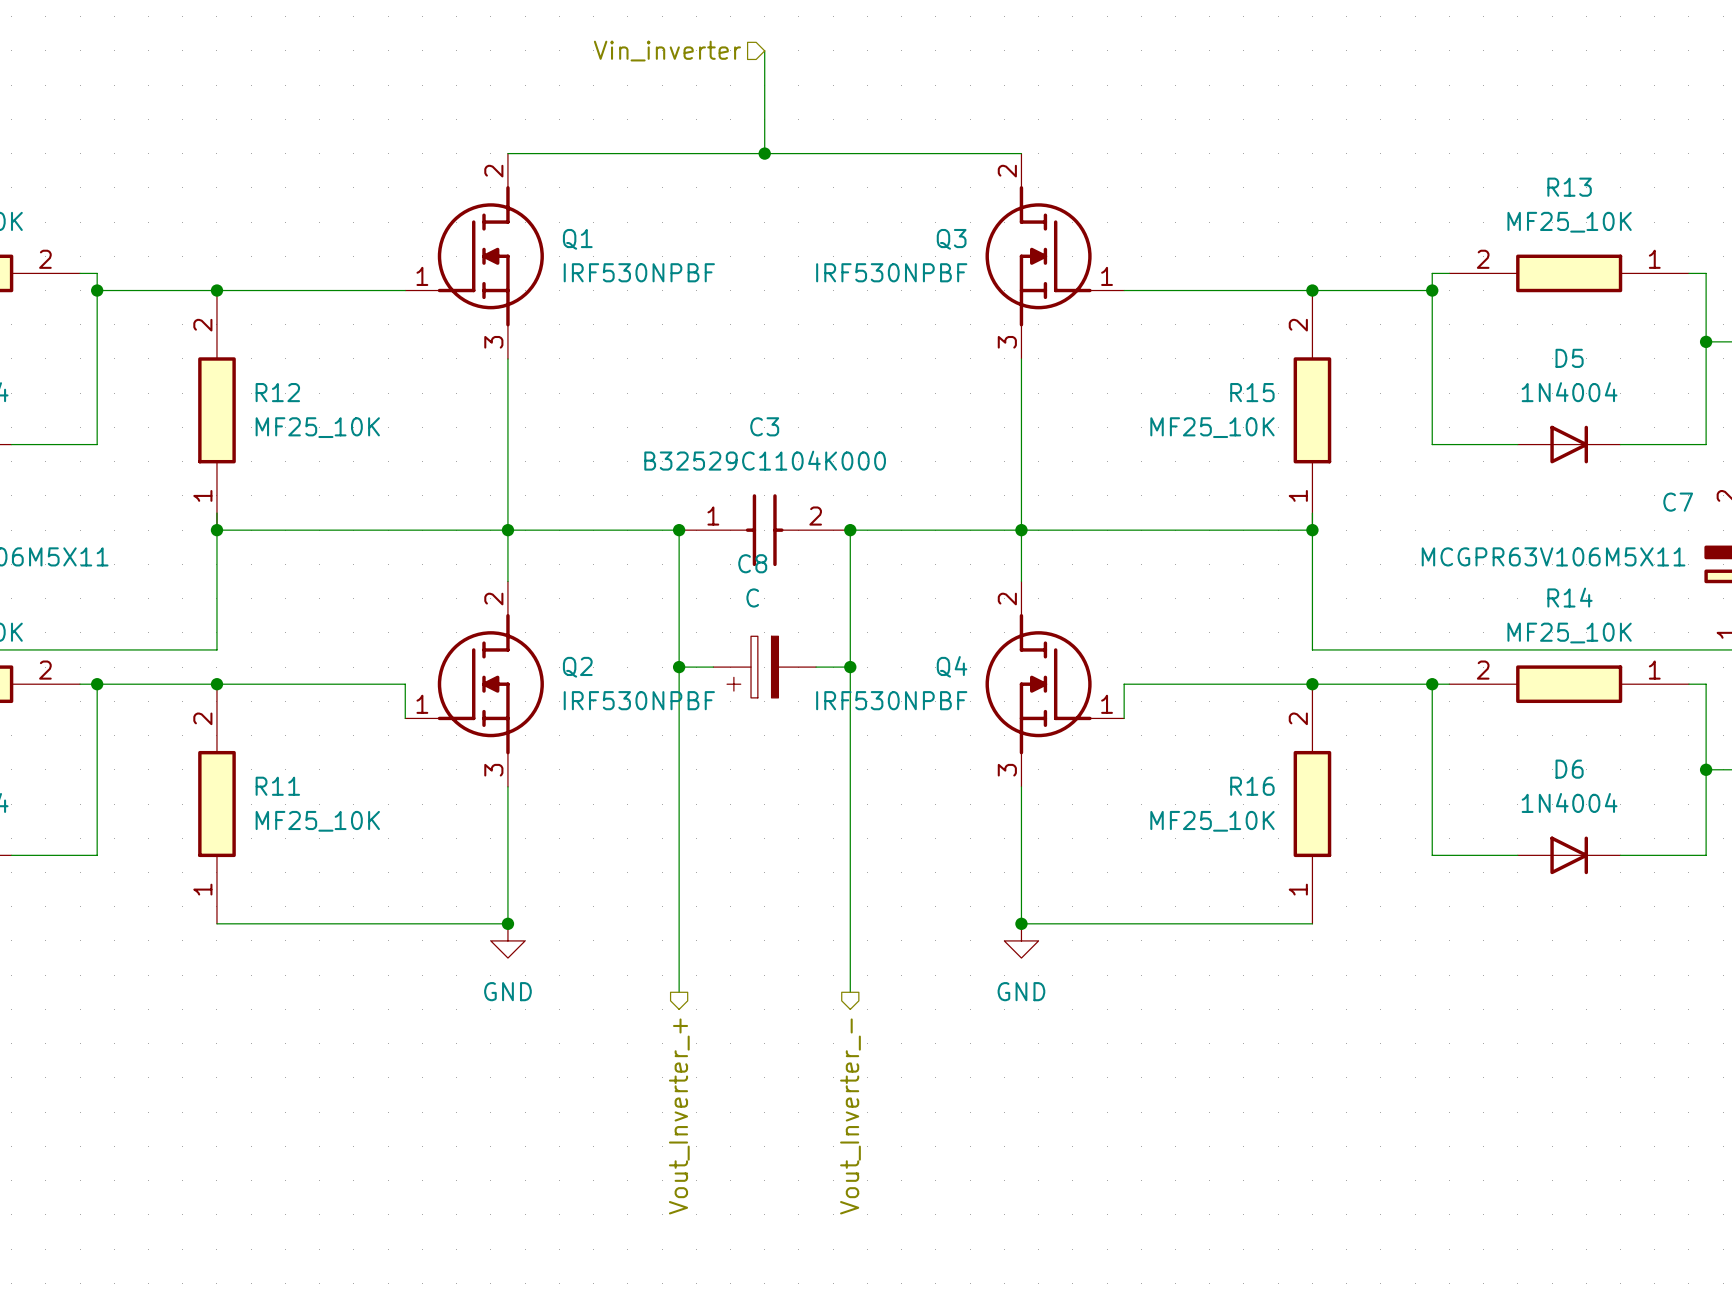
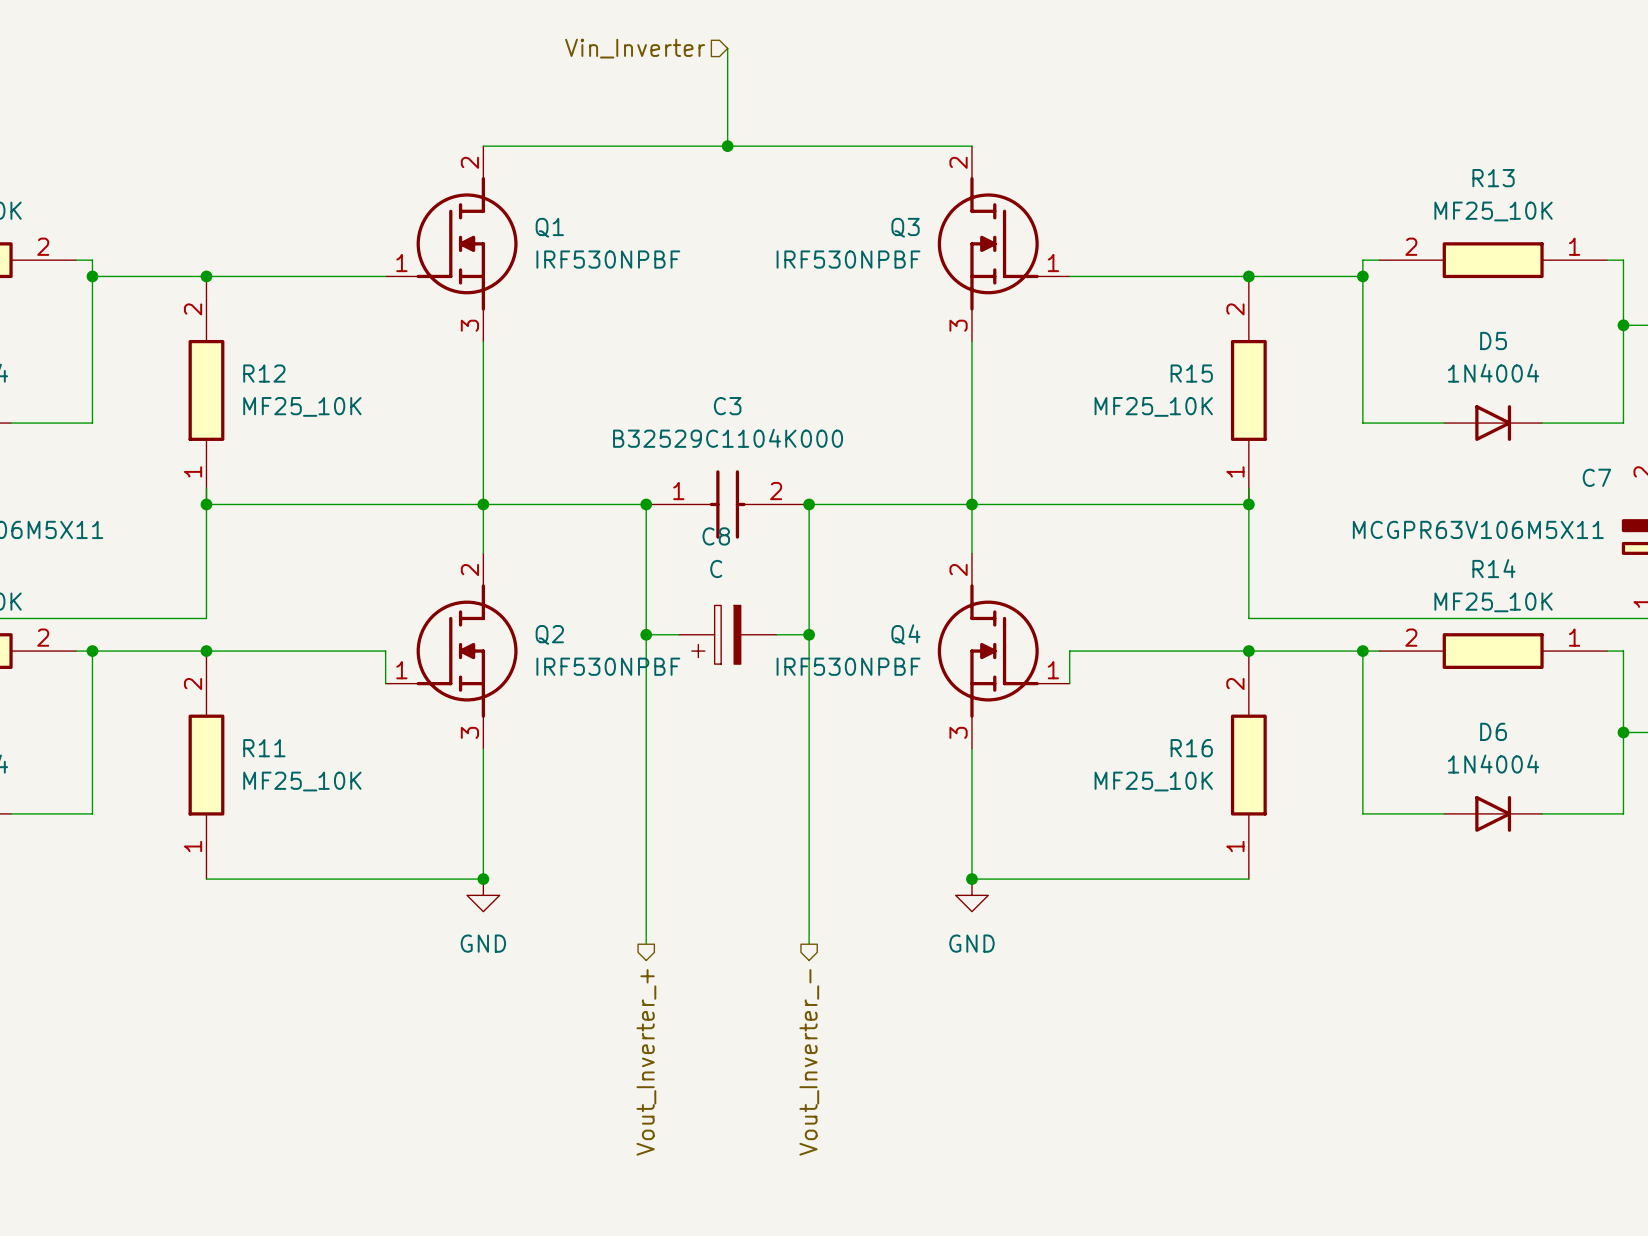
hierarchical label: Vin_inverter (667, 51) -> Vin_Inverter (635, 48)

